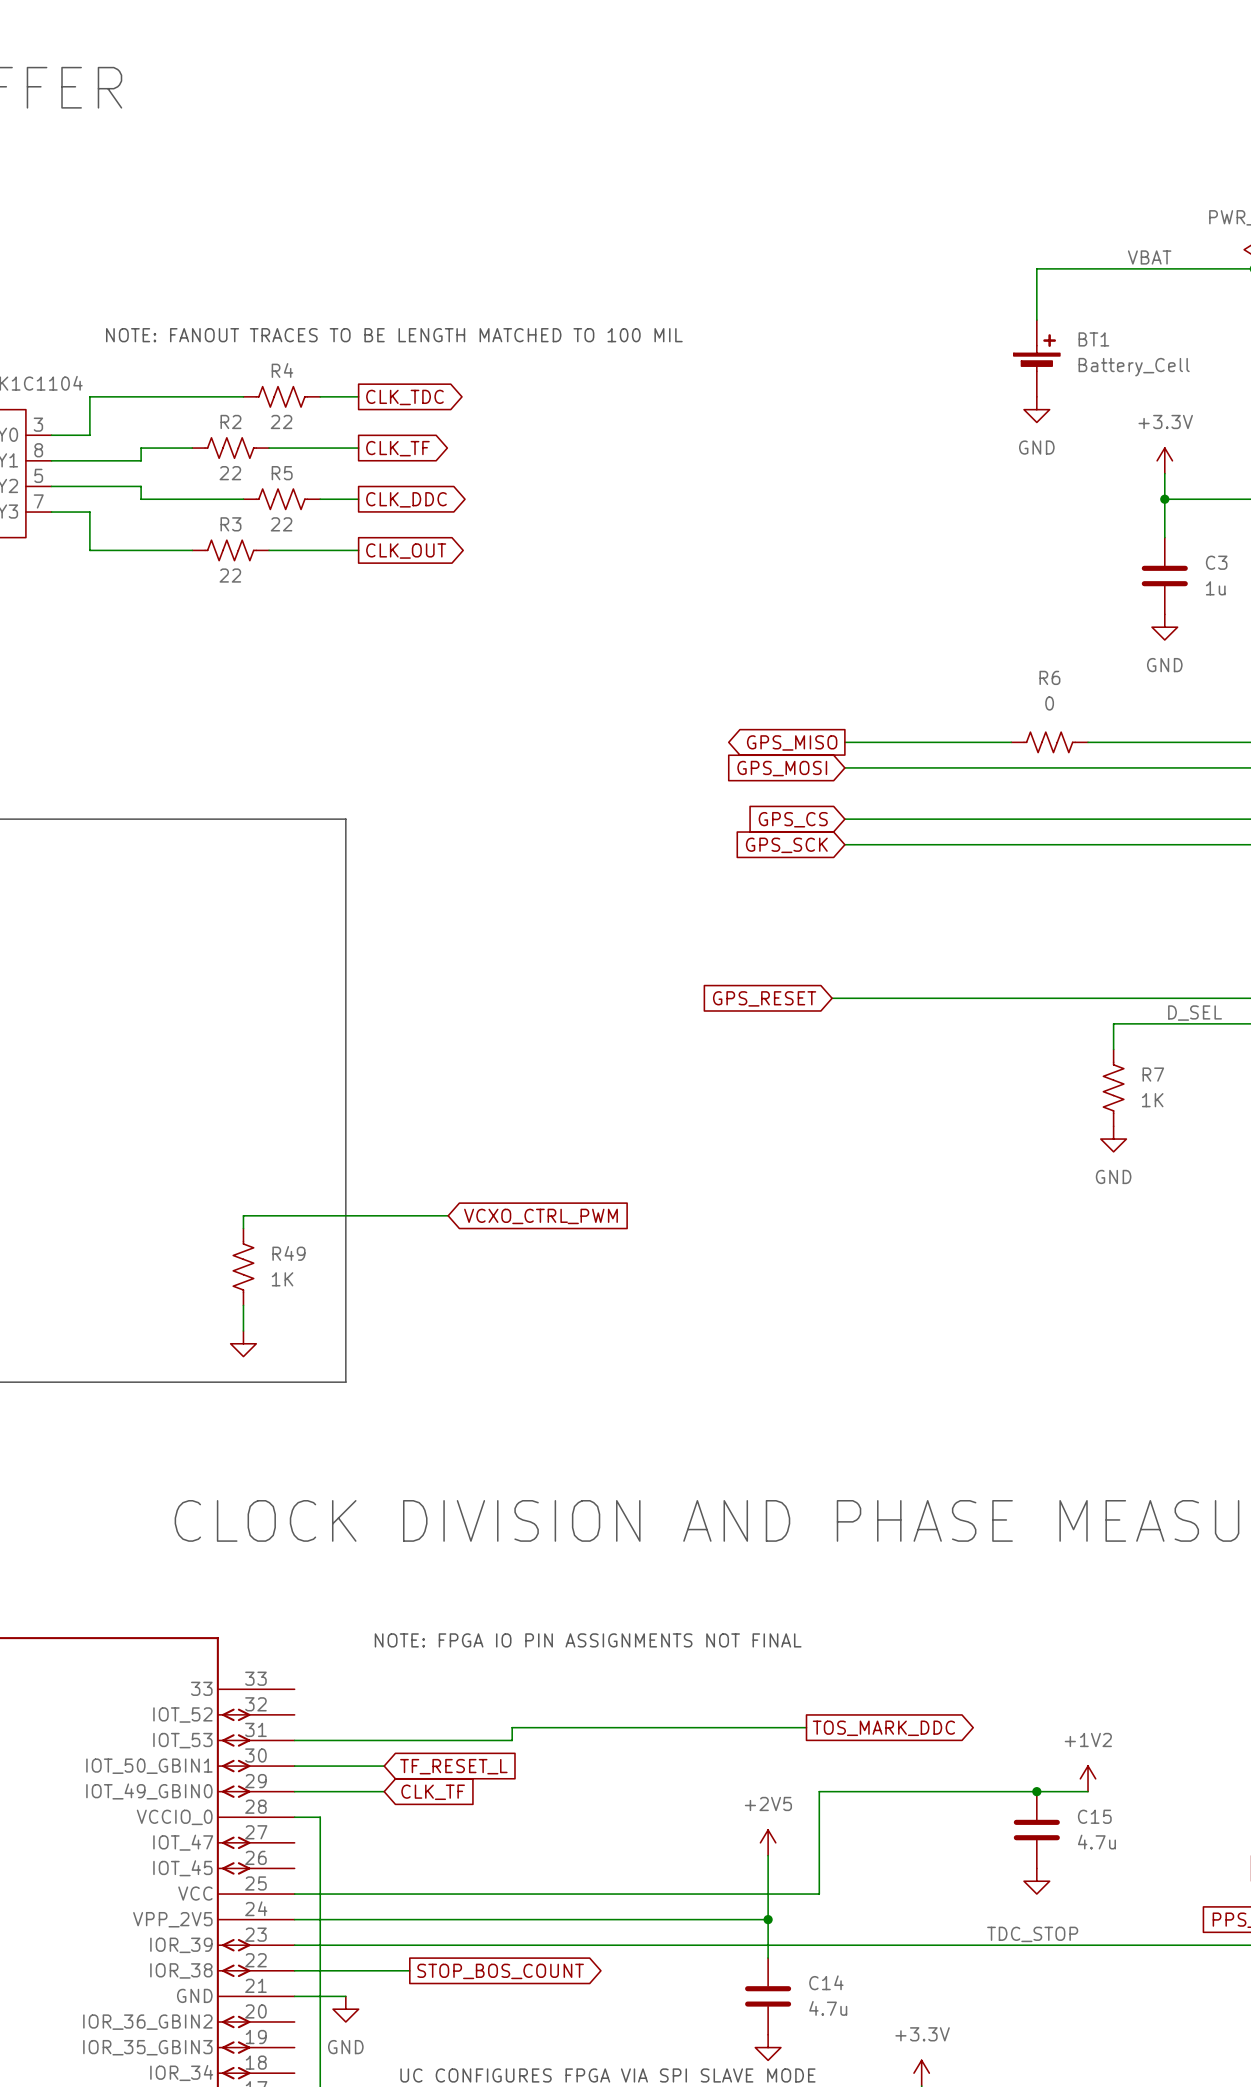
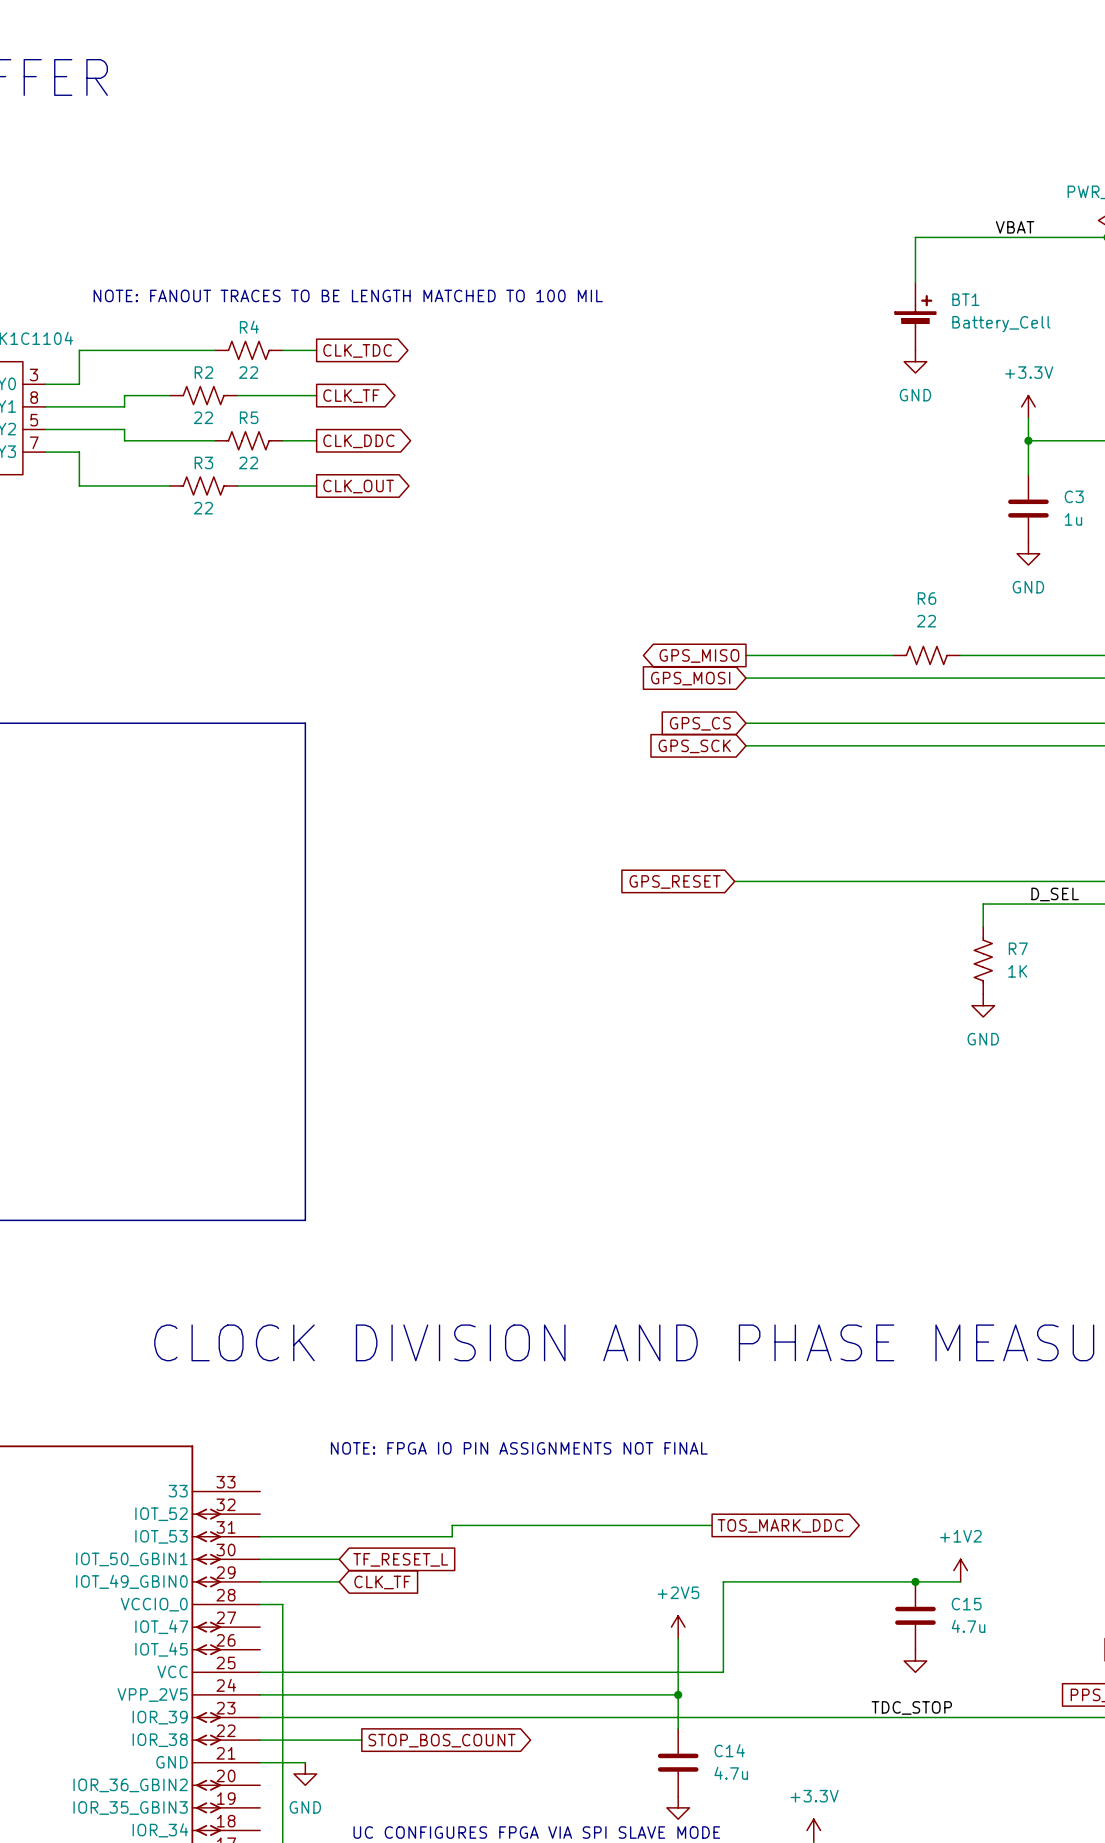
R6 value: 0 (1049, 703) -> 22 (926, 621)
wire: (448, 1215) (243, 1215) (243, 1228) -> none
global label: VCXO_CTRL_PWM (540, 1216) -> none
R49: 1K (243, 1267) -> none
wire: (243, 1305) (243, 1330) -> none
power symbol: (243, 1343) -> none

